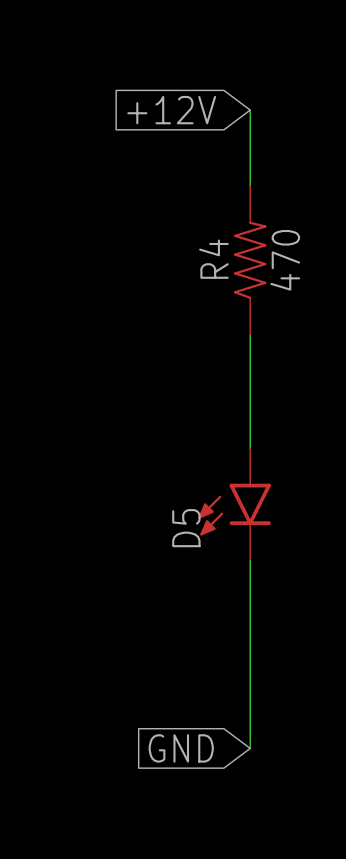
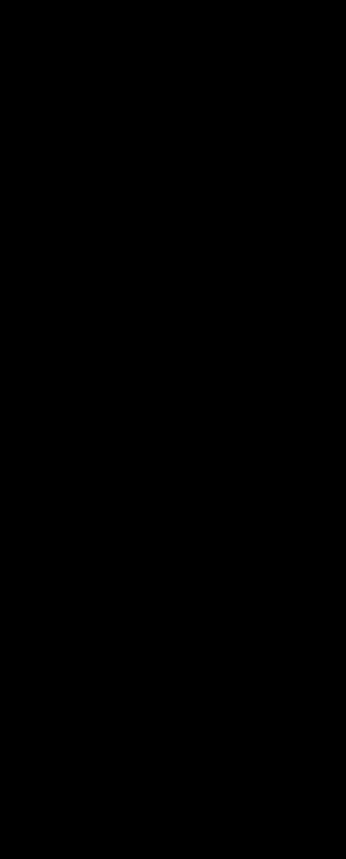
global label: +12V (171, 110) -> none
wire: (250, 110) (250, 185) -> none
R4: 470 (250, 260) -> none
wire: (250, 335) (250, 448) -> none
D5: (234, 504) -> none
wire: (250, 560) (250, 748) -> none
global label: GND (181, 748) -> none

